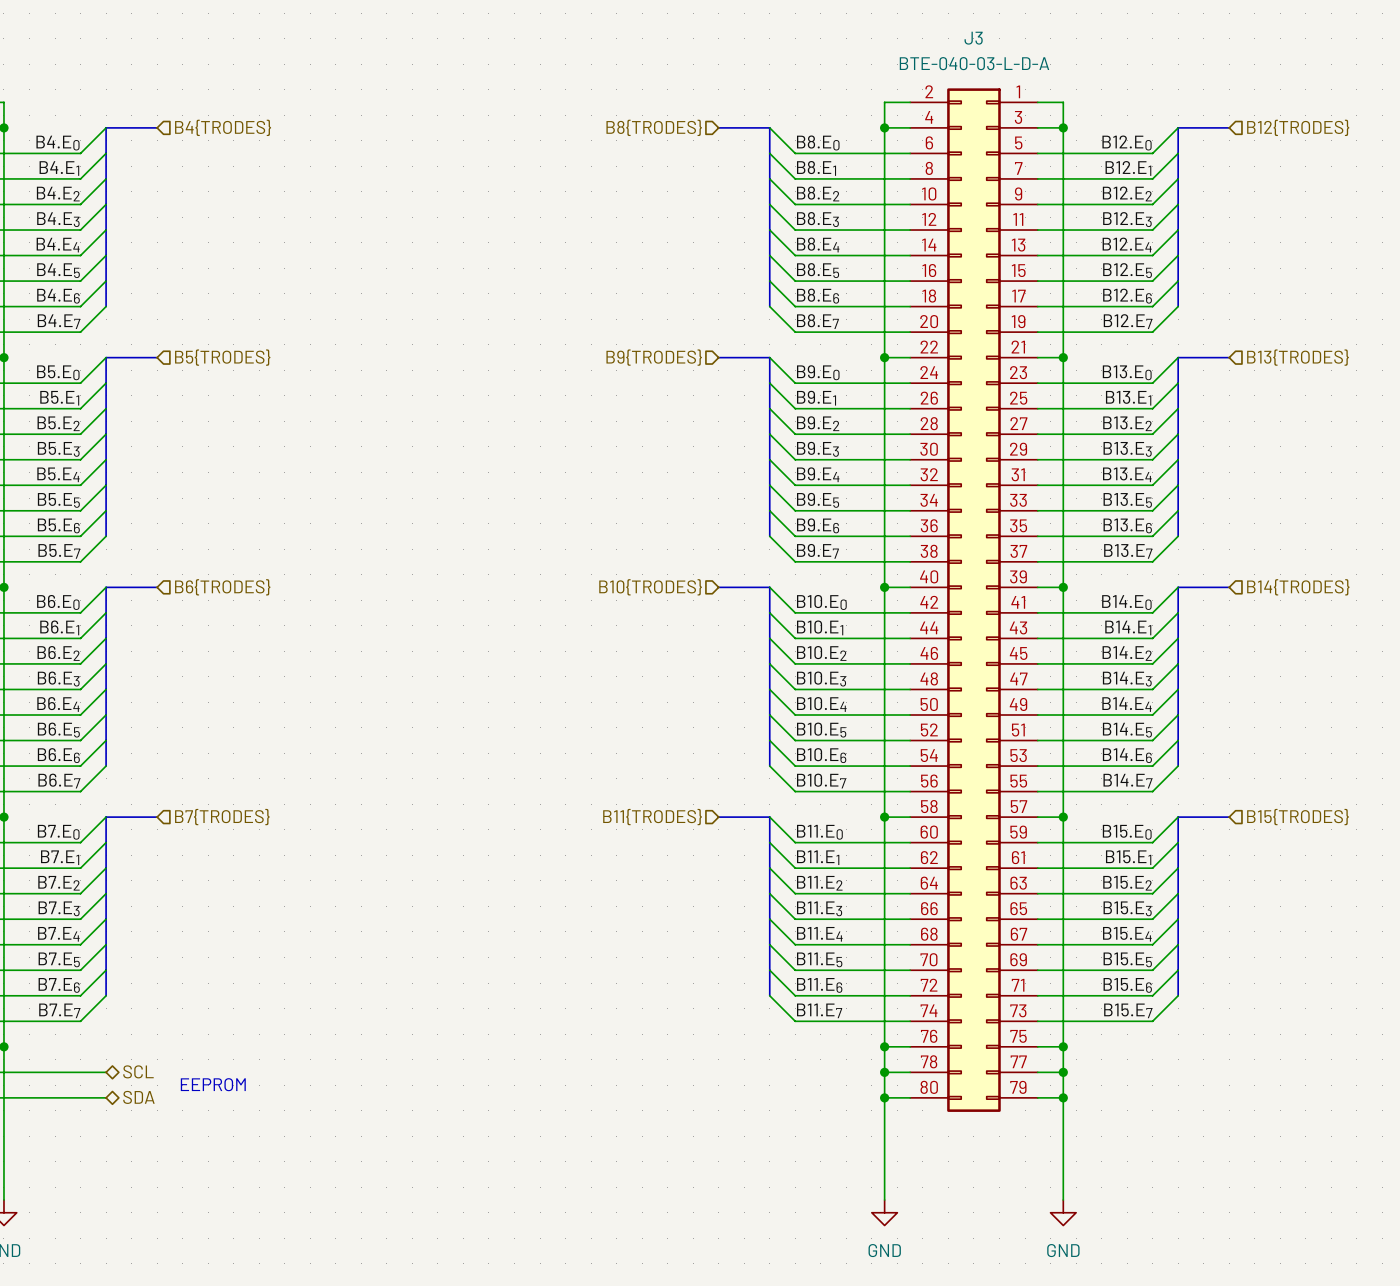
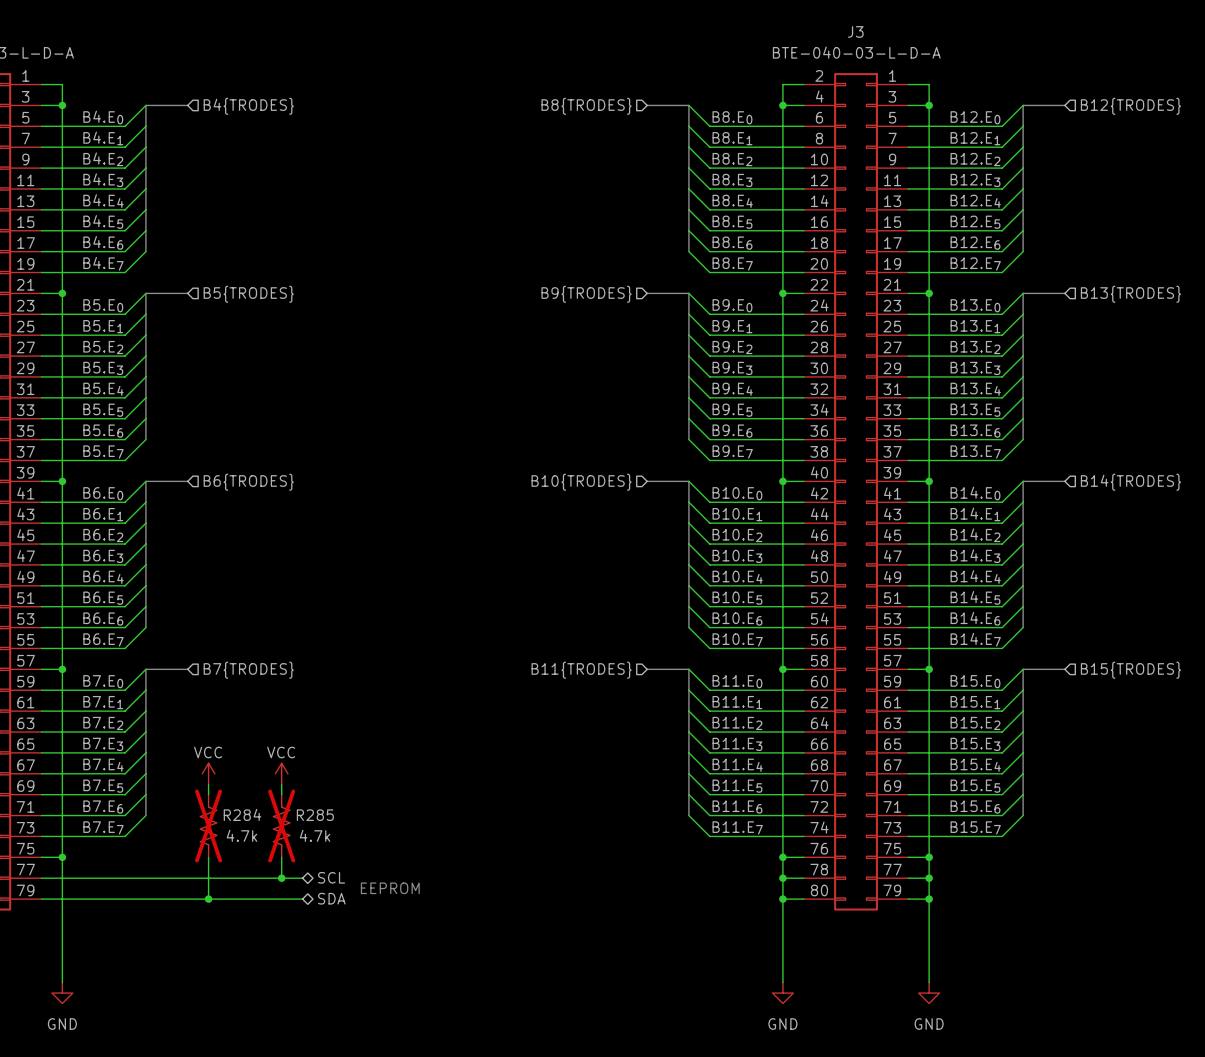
power symbol: none -> VCC (208, 773)
power symbol: none -> VCC (281, 773)
wire: none -> (208, 784) (208, 794)
wire: none -> (281, 784) (281, 794)
R284: none -> 4.7k (208, 825)
R285: none -> 4.7k (281, 825)
wire: none -> (208, 857) (208, 899)
wire: none -> (281, 857) (281, 878)
hierarchical label position: SCL (138, 1071) -> SCL (331, 877)
wire: none -> (145, 878) (302, 878)
junction: none -> (281, 878)
text position: EEPROM (213, 1084) -> EEPROM (390, 888)
wire: none -> (145, 899) (302, 899)
hierarchical label position: SDA (138, 1097) -> SDA (331, 898)
junction: none -> (208, 899)

